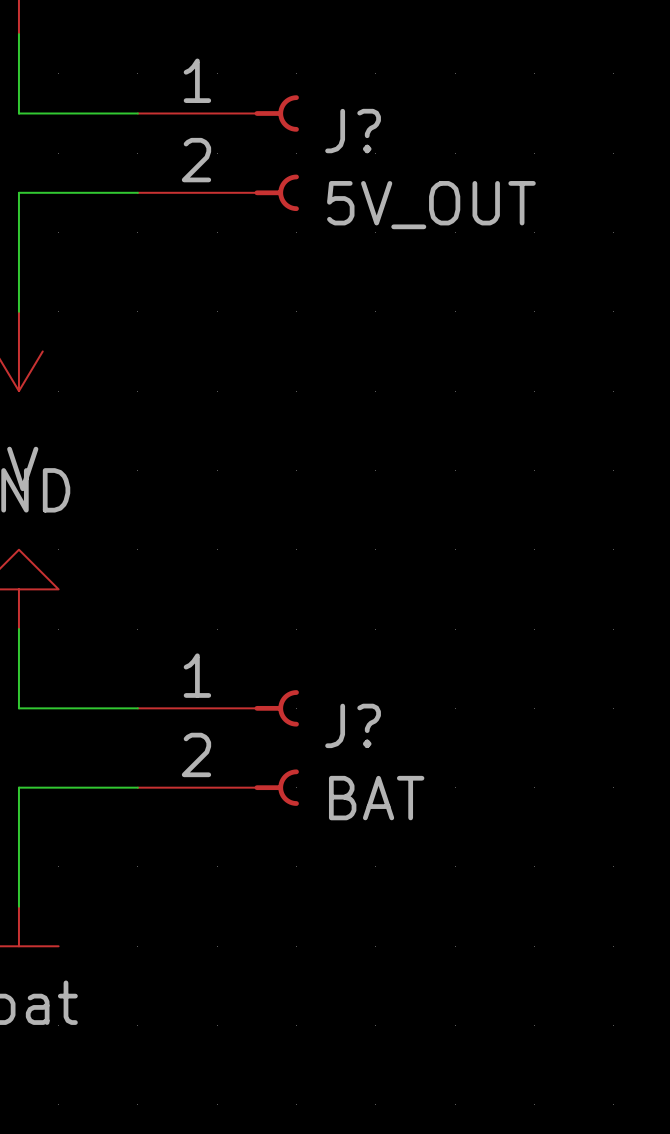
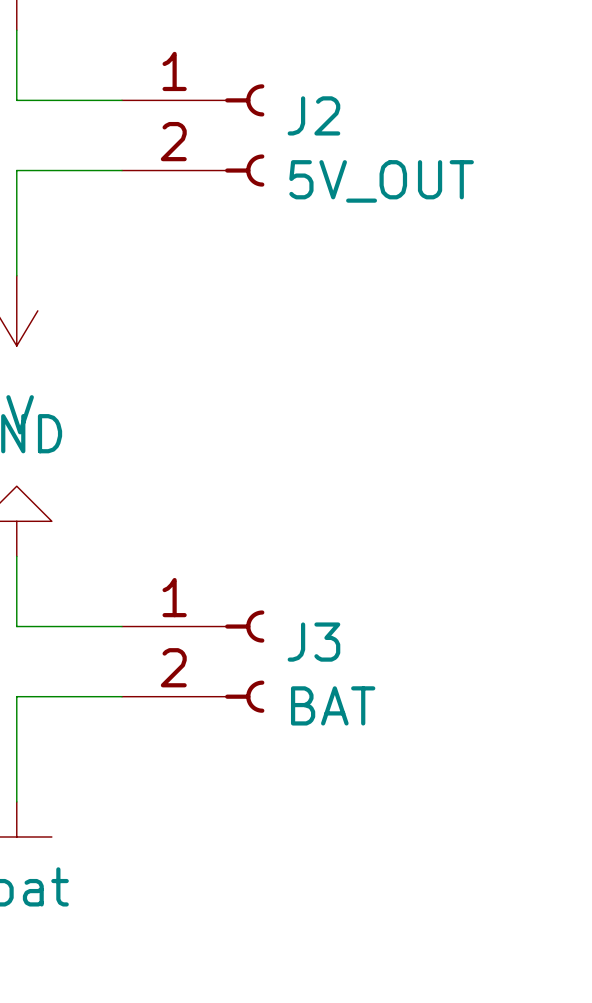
J? name: J? (353, 131) -> J2 (313, 115)
J? name: J? (353, 725) -> J3 (313, 642)

